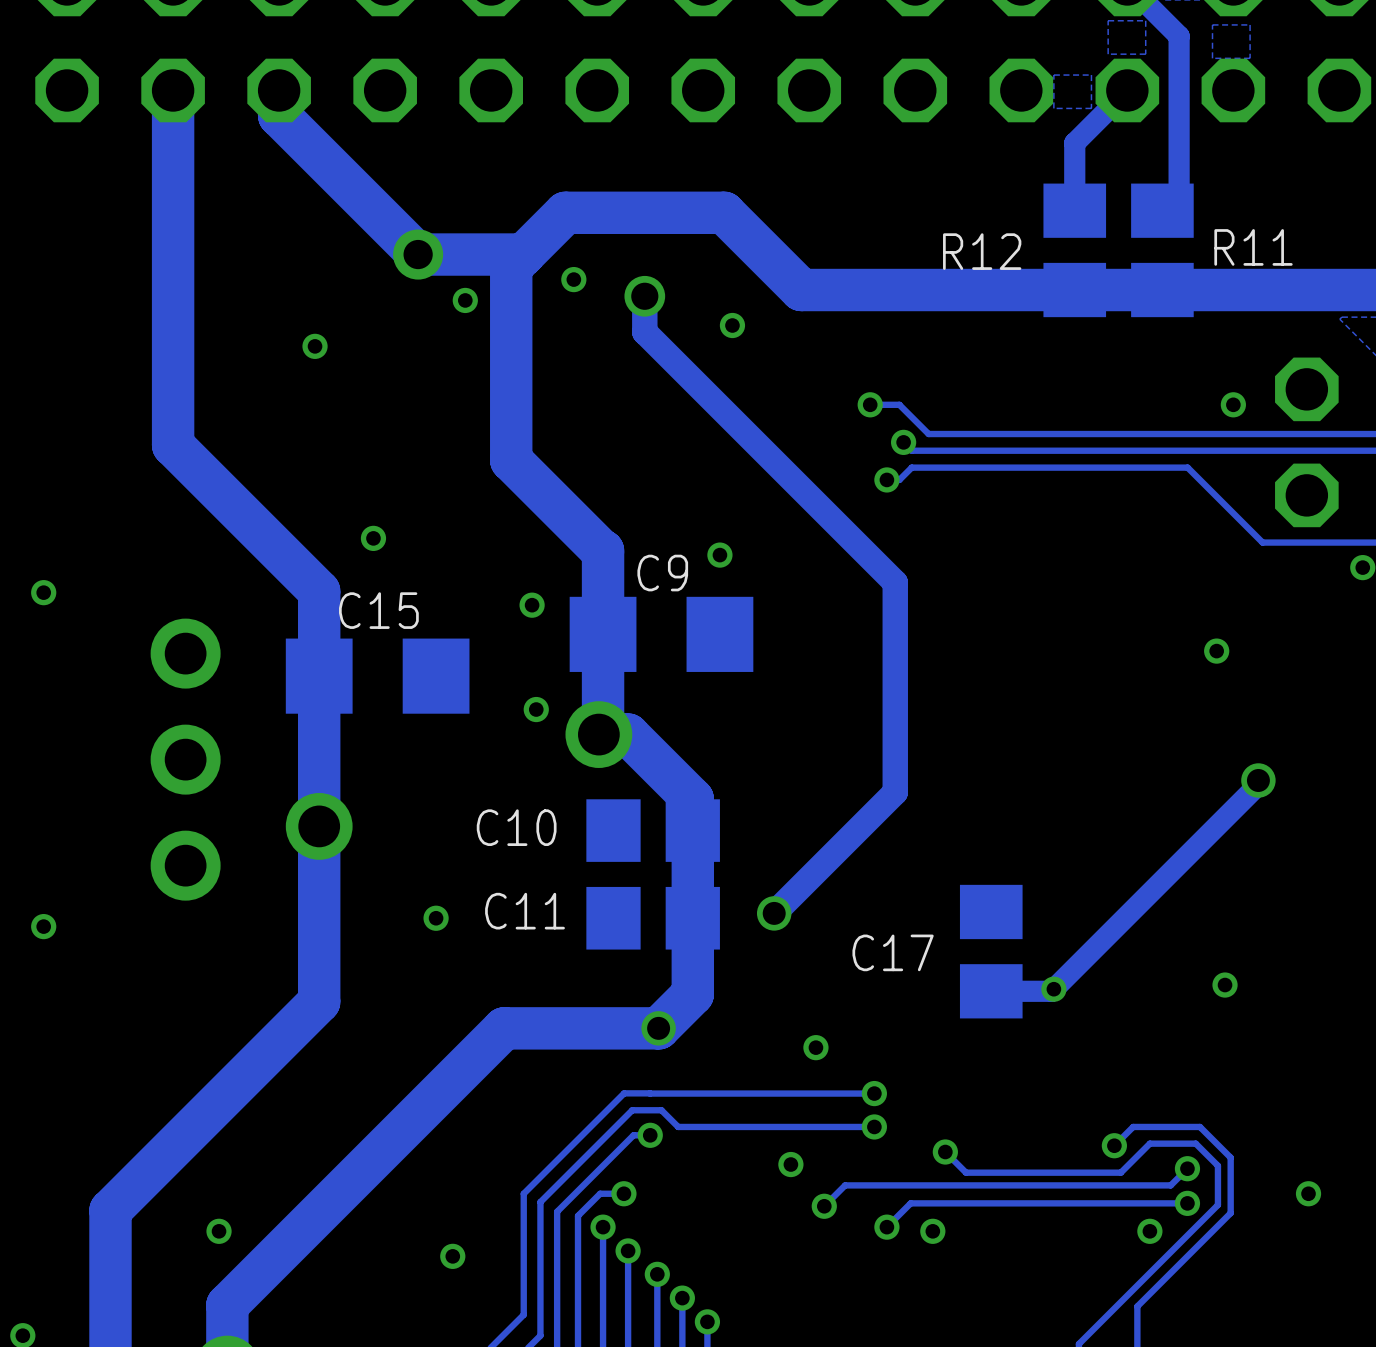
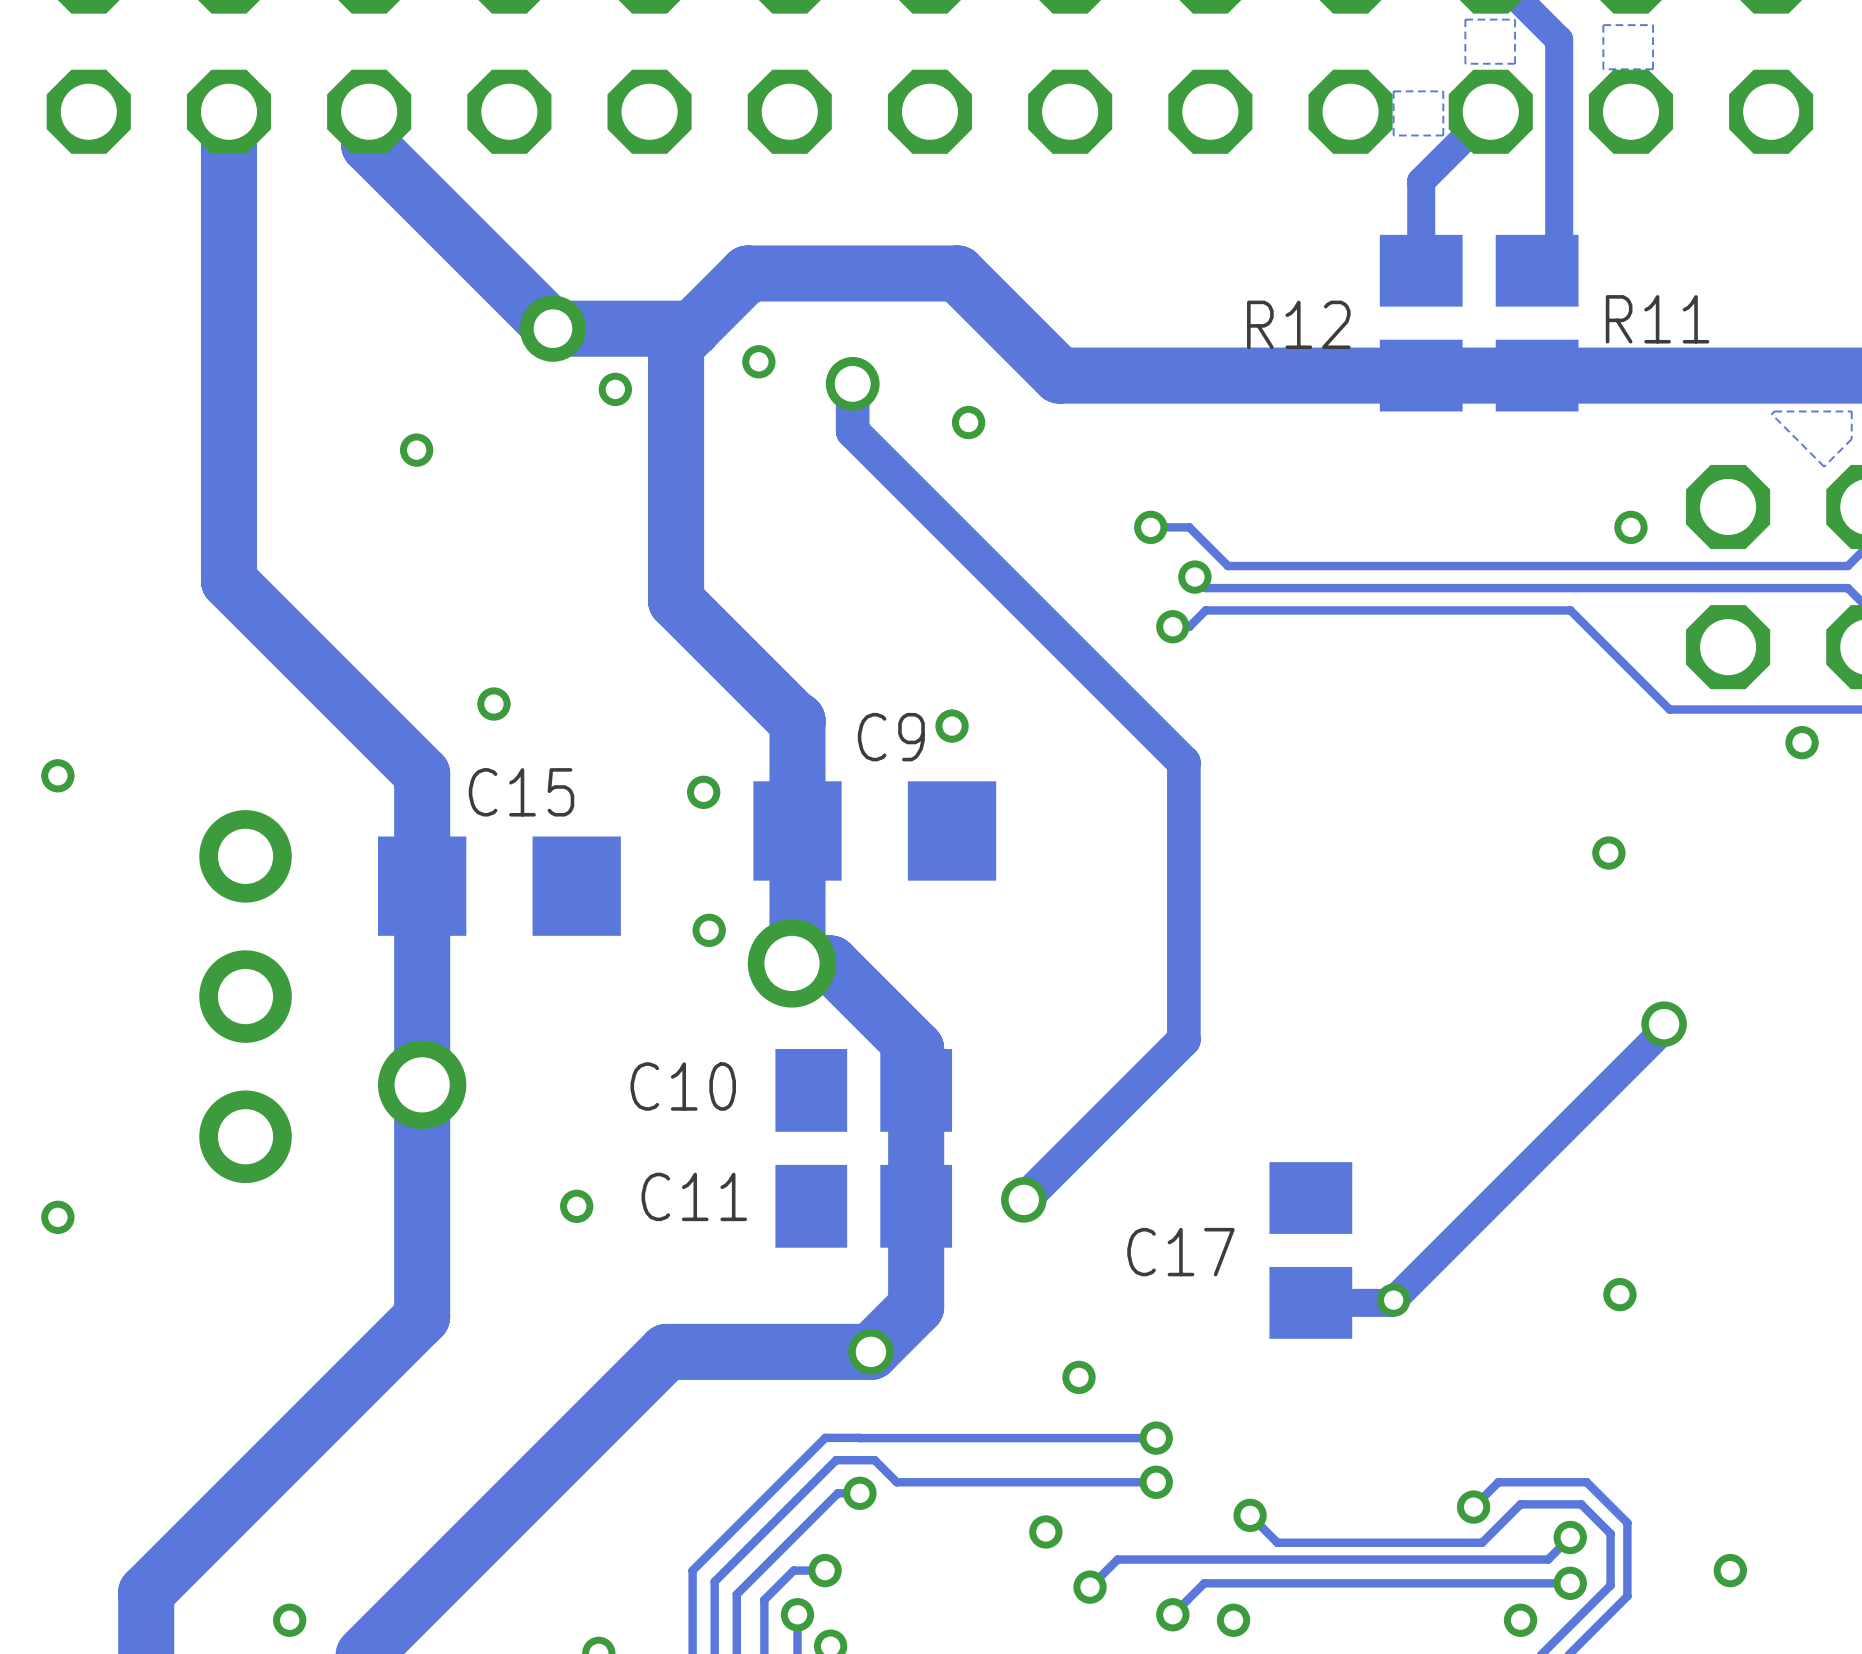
C9 name position: C9 (662, 573) -> C9 (891, 737)
C15 name position: C15 (378, 610) -> C15 (521, 792)

